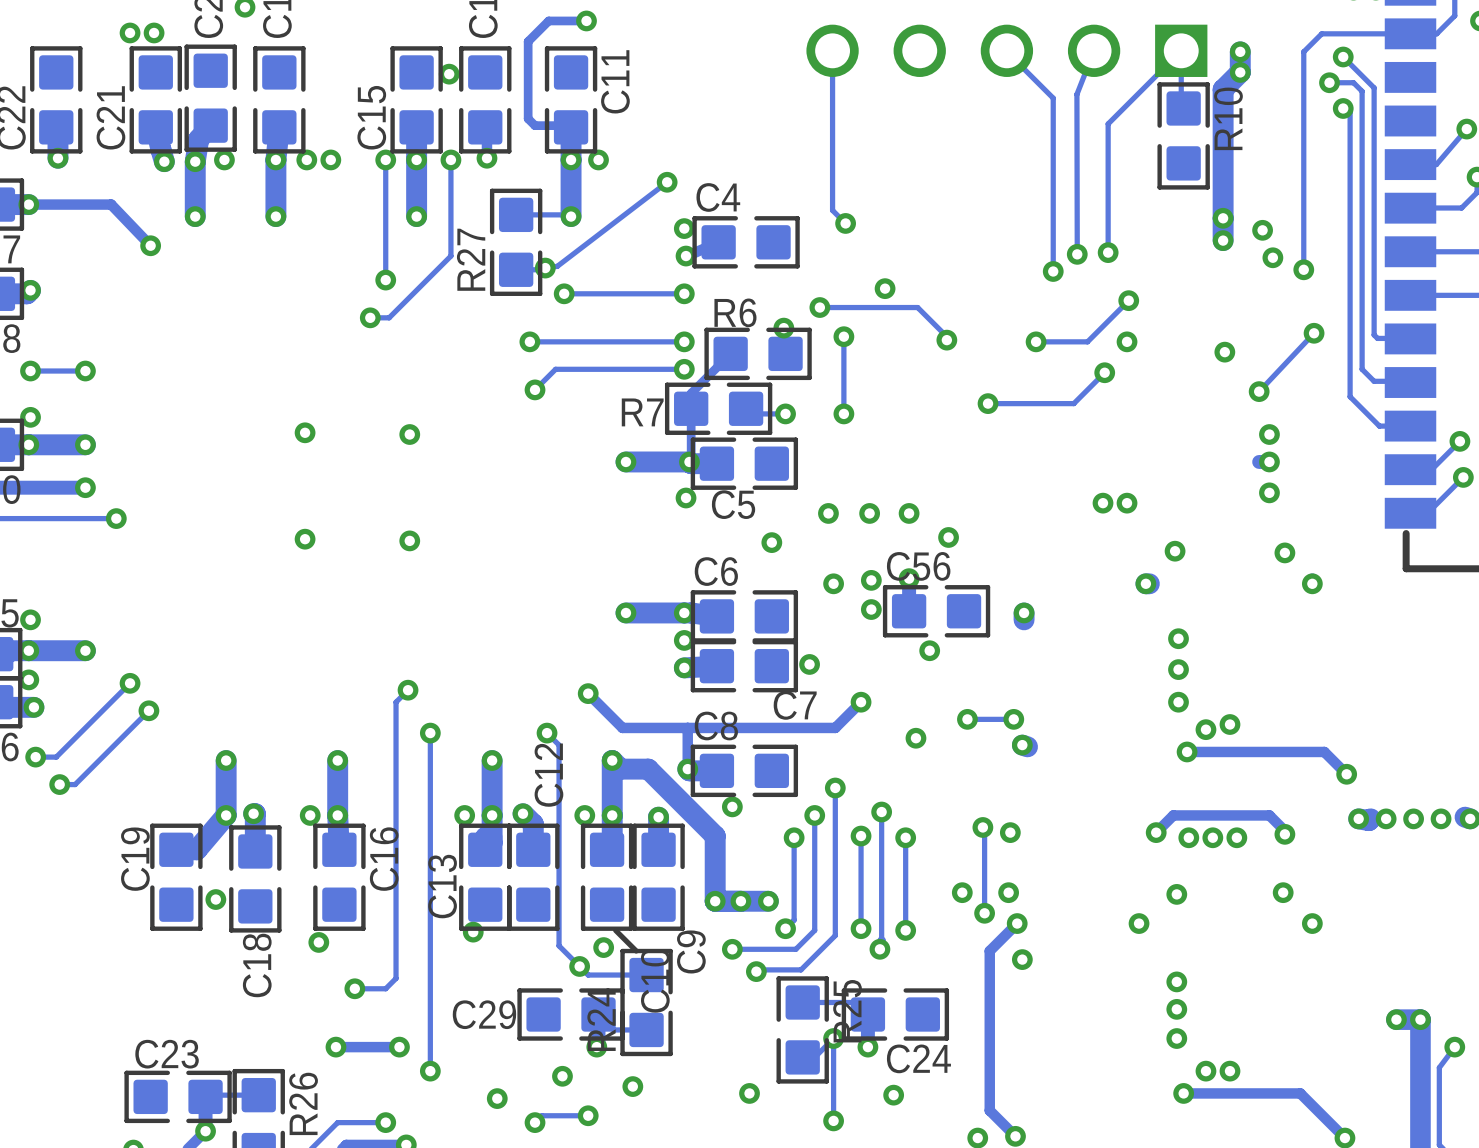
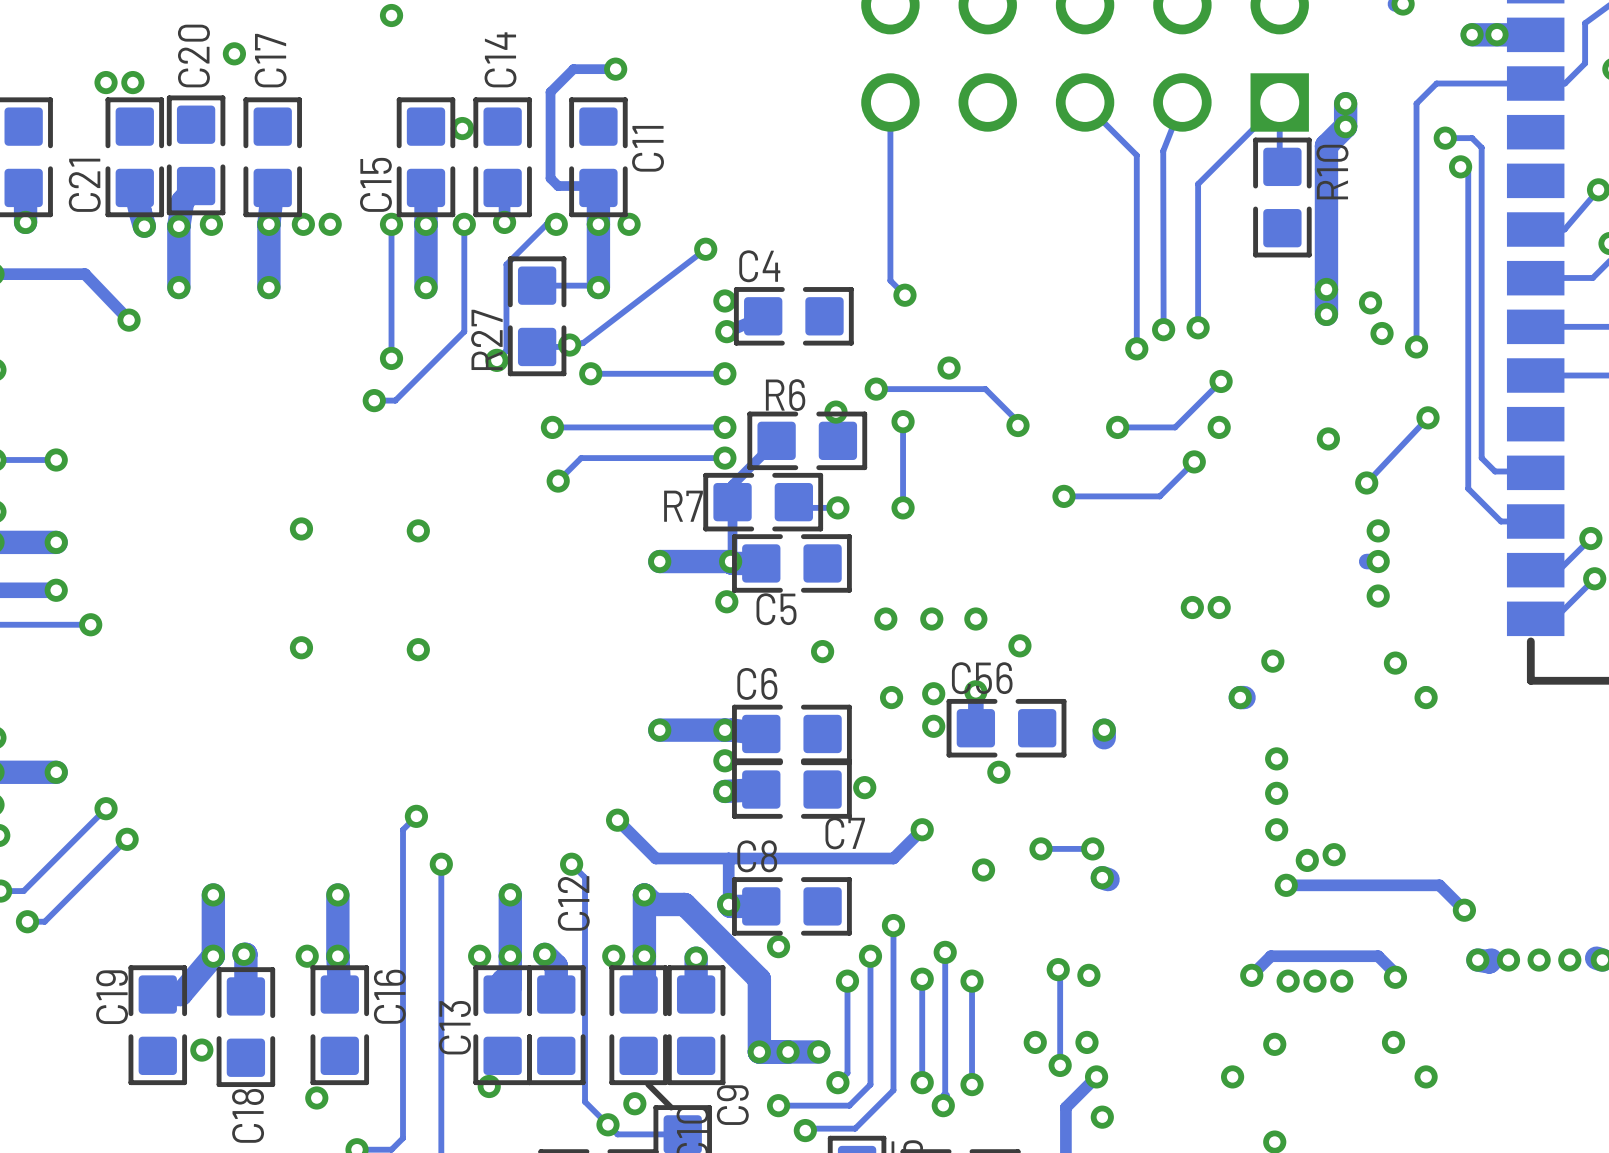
track: (1343, 57) (1374, 87) (1374, 334) (1377, 338) (1410, 338) -> none
via: (1343, 57) -> none
track: none -> (556, 224) (546, 224) (506, 264) (506, 350) (496, 360)
via: none -> (556, 224)
via: none -> (496, 360)

